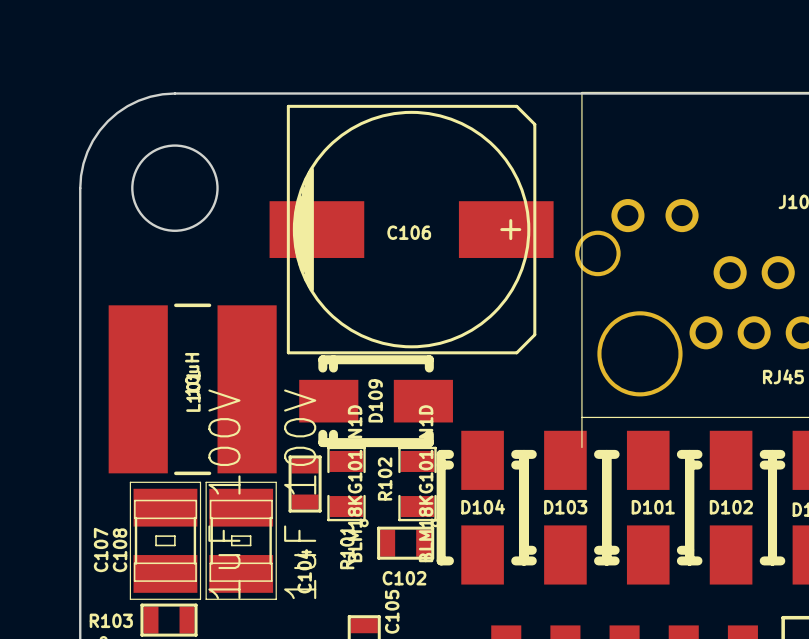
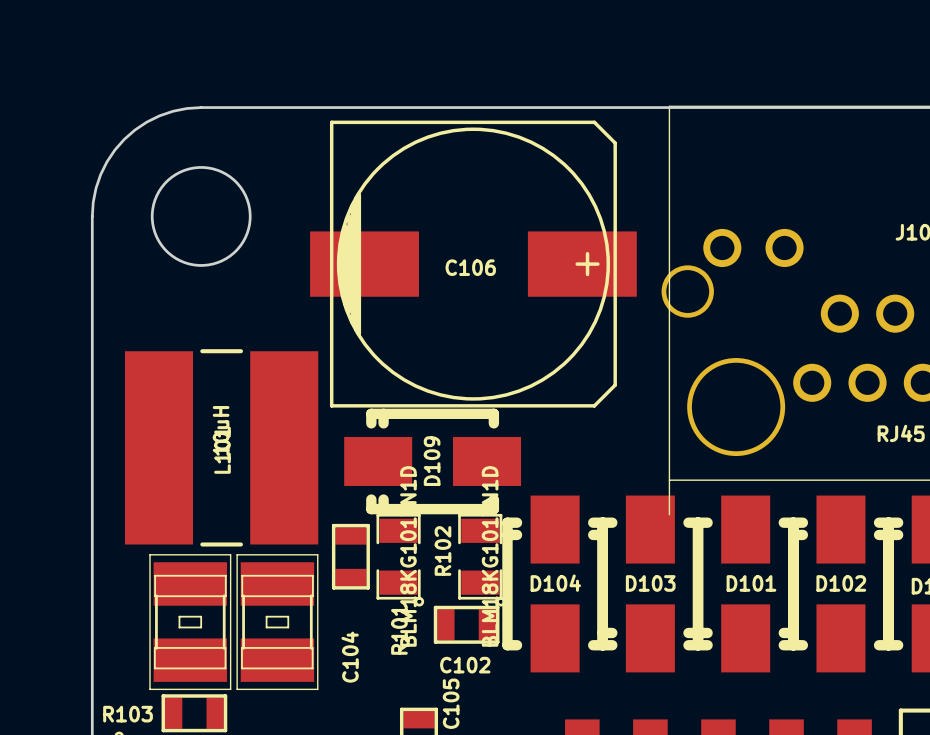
C107 value: 1uF 100V (224, 494) -> none
C108 value: 1uF 100V (300, 494) -> none
C107 name: C107 (101, 549) -> none
C108 name: C108 (120, 550) -> none

